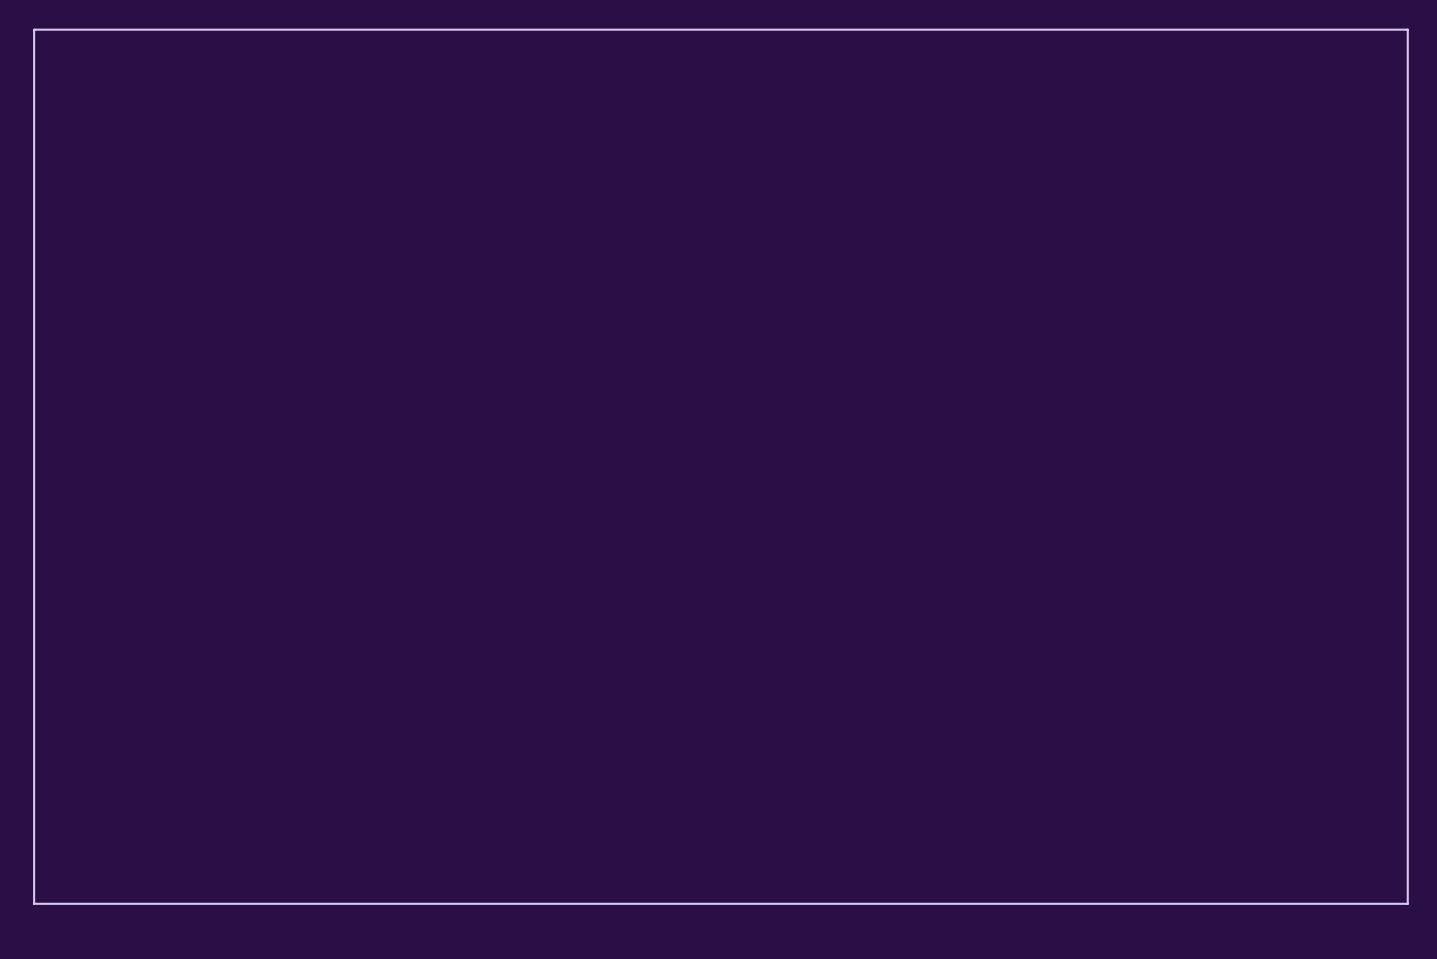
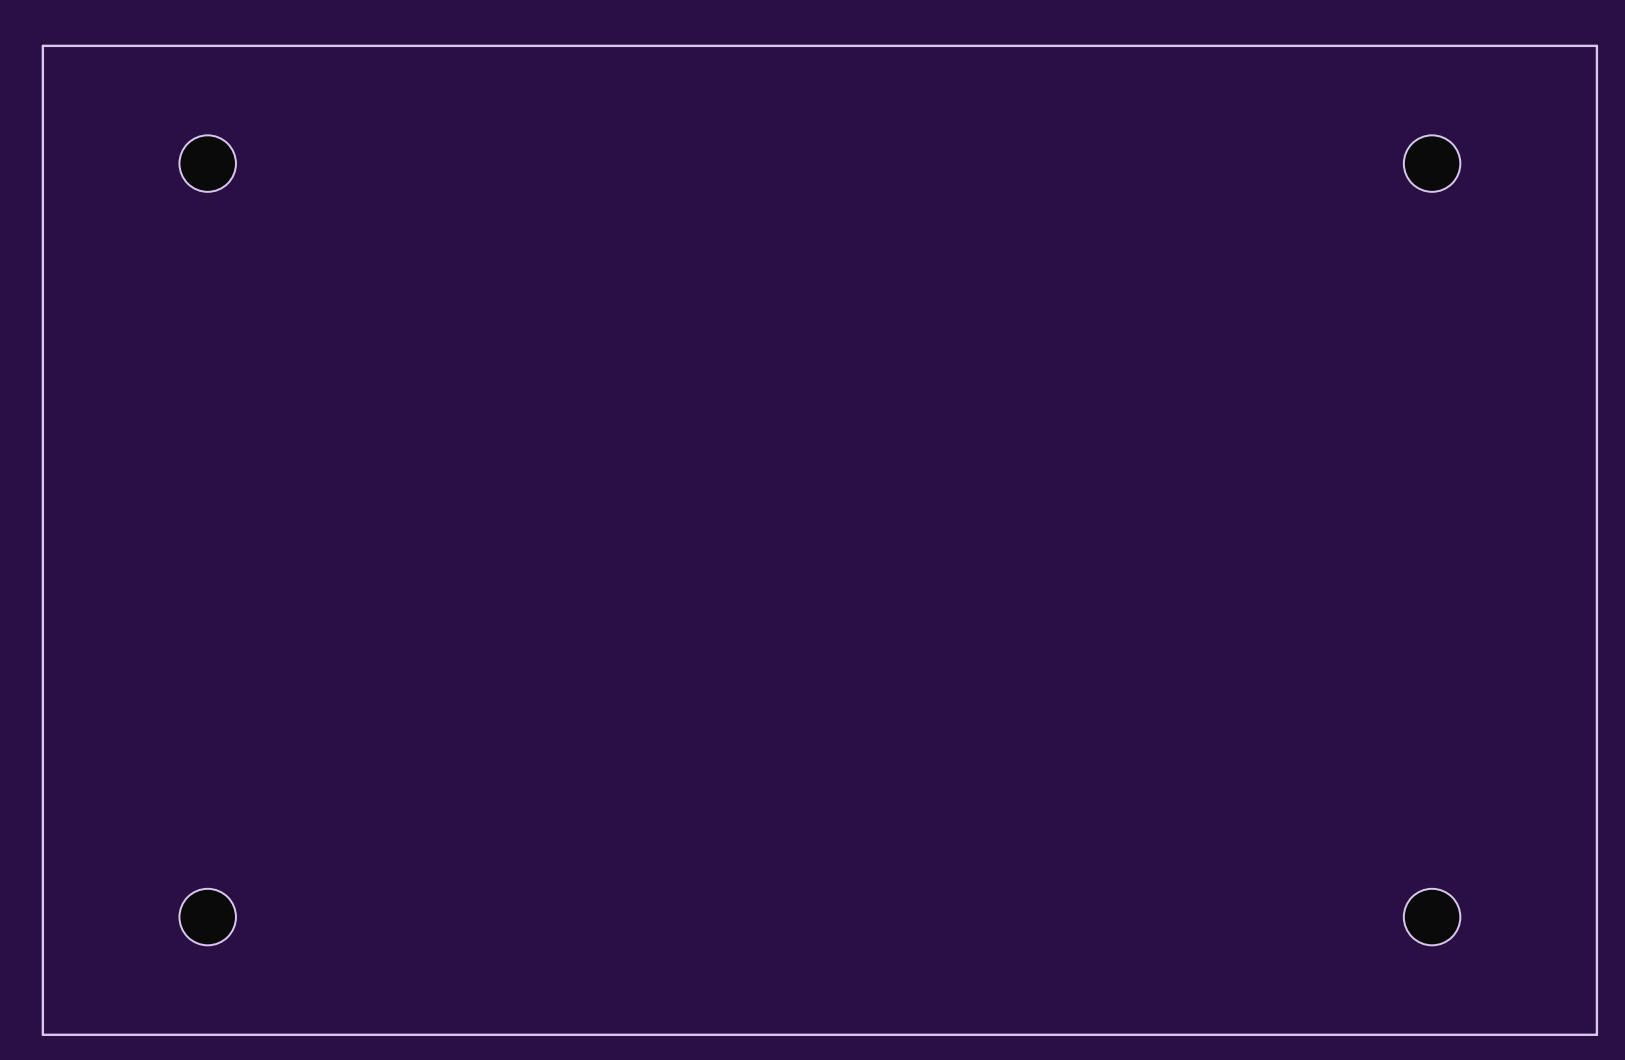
part: none -> (207, 163)
part: none -> (1432, 163)
part: none -> (207, 917)
part: none -> (1432, 917)

